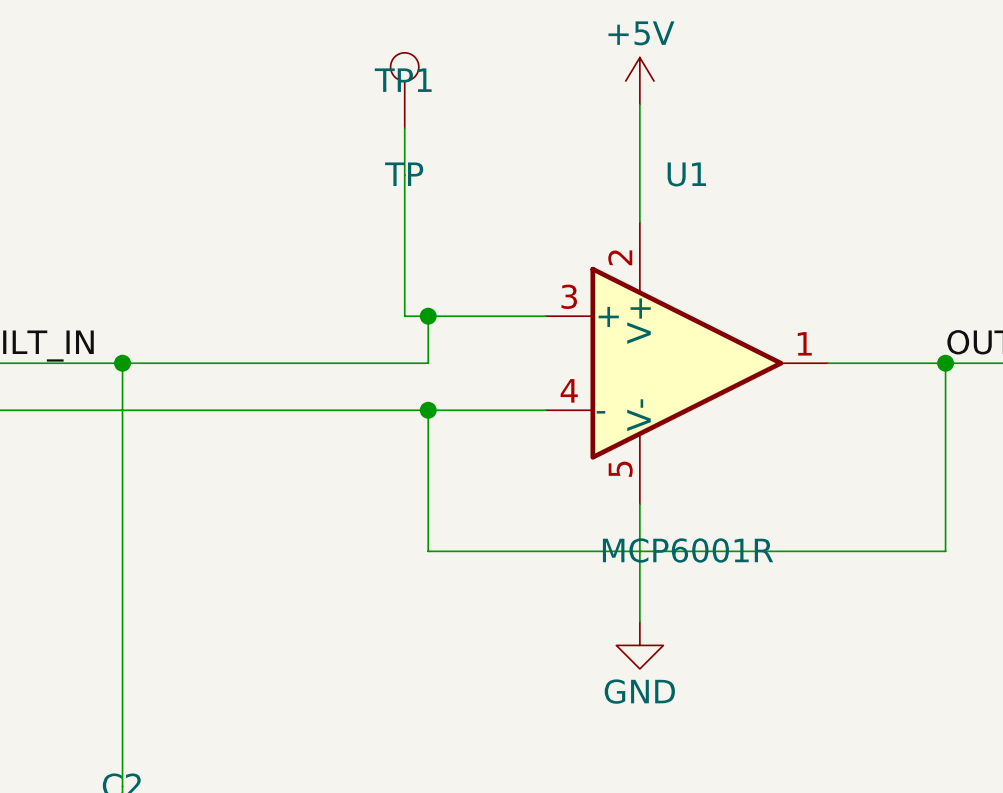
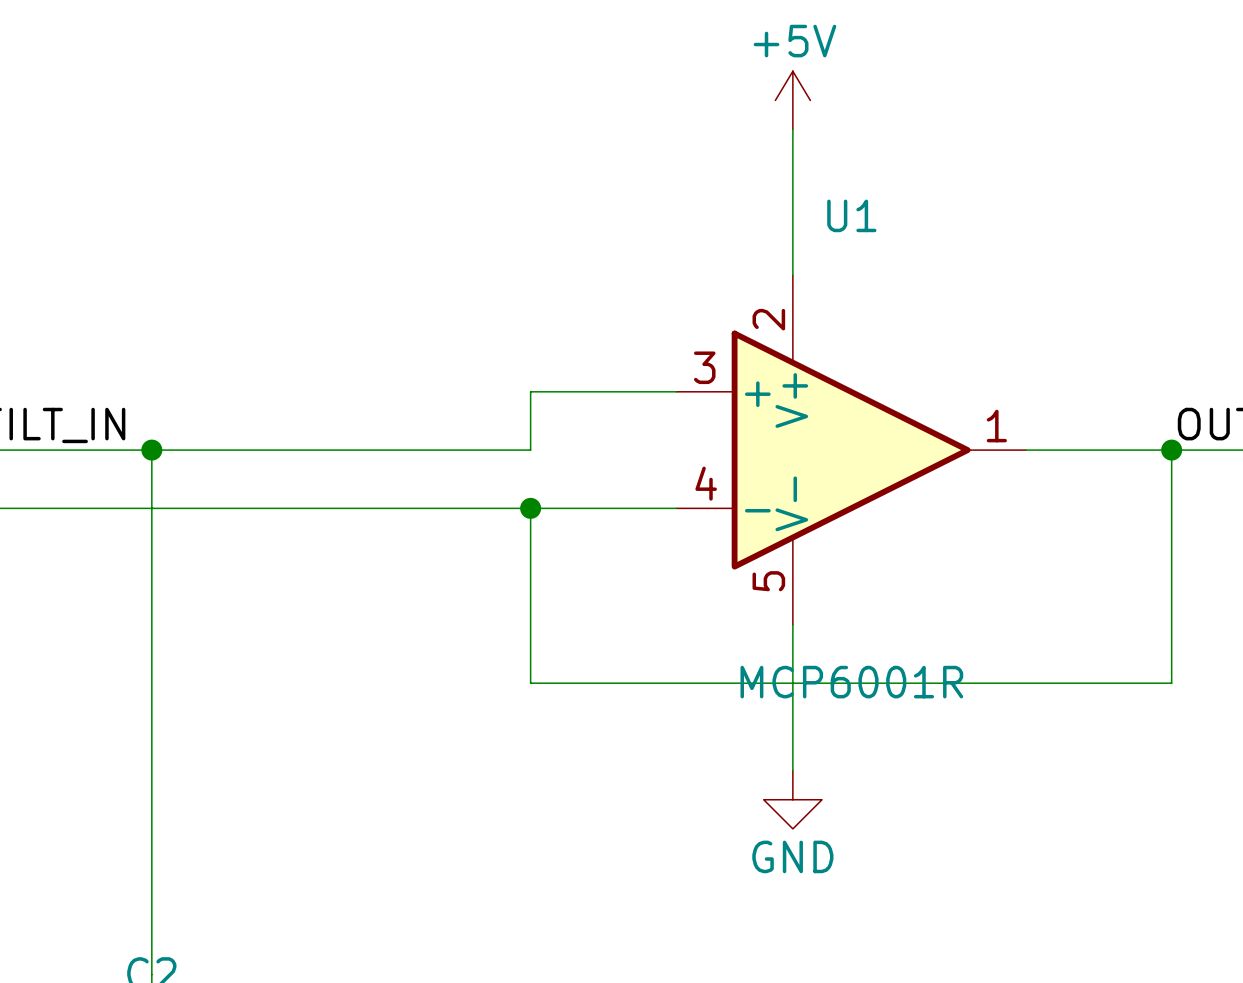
TP1: TP (404, 90) -> none
wire: (404, 128) (404, 316) (428, 316) -> none
junction: (428, 316) -> none

